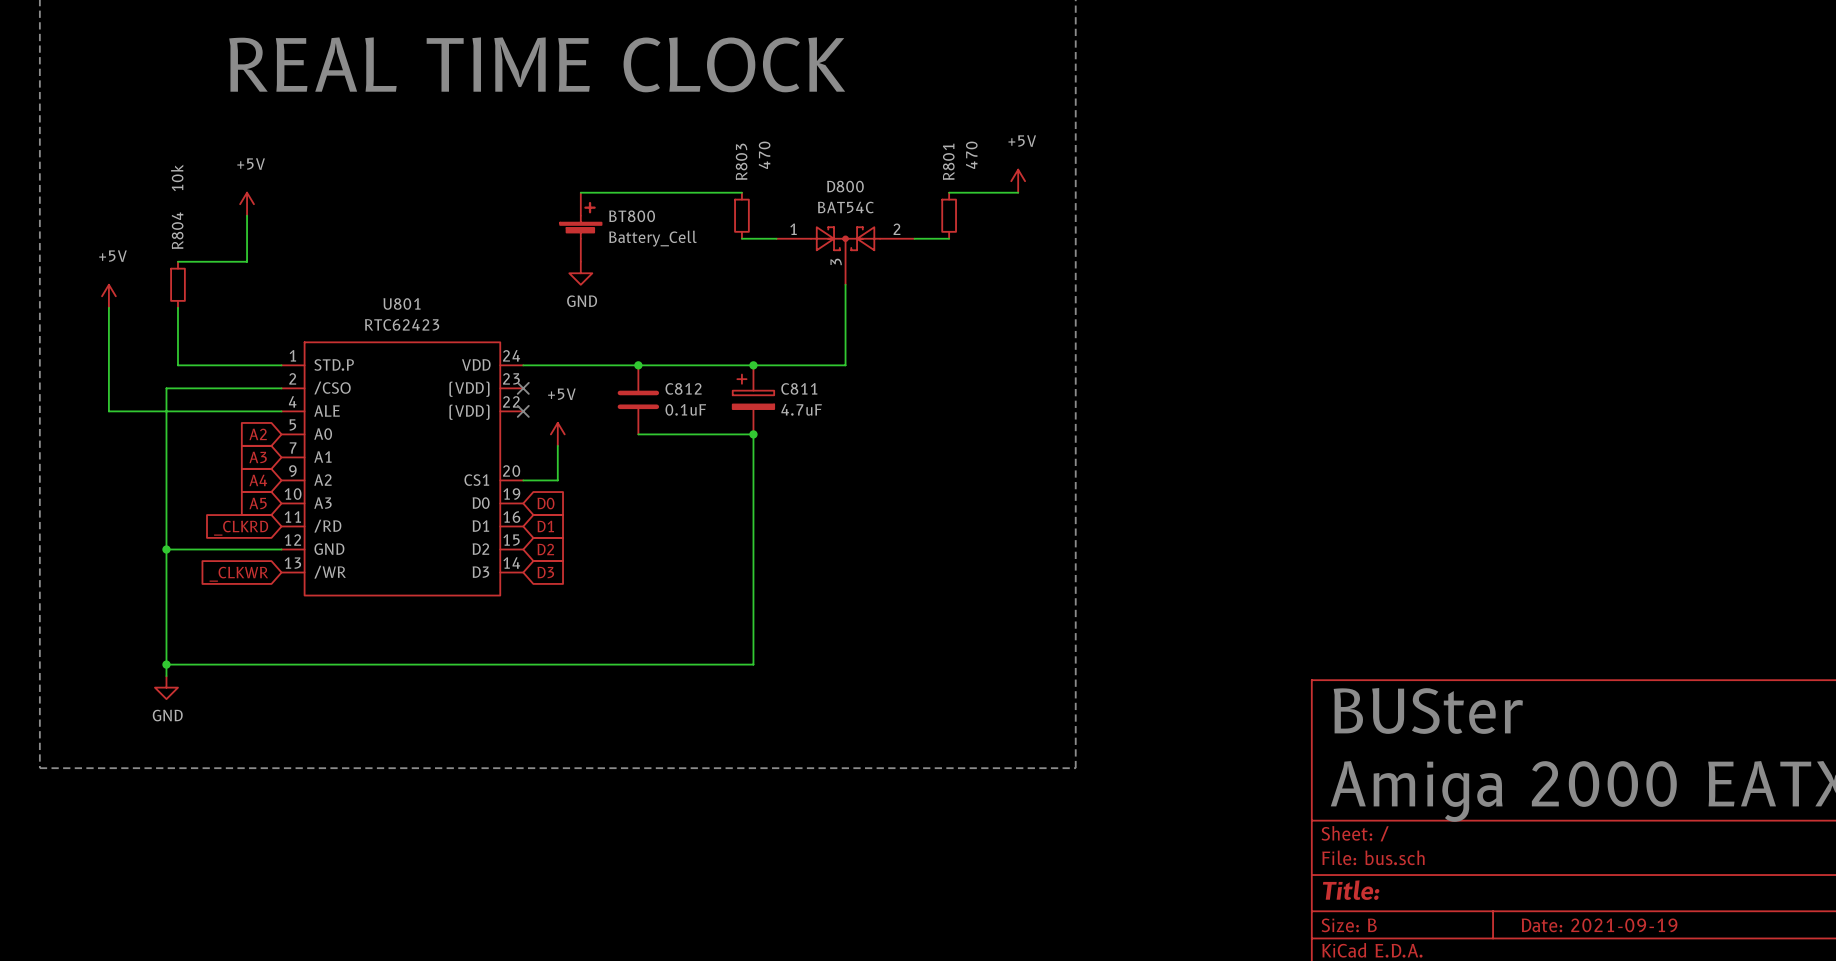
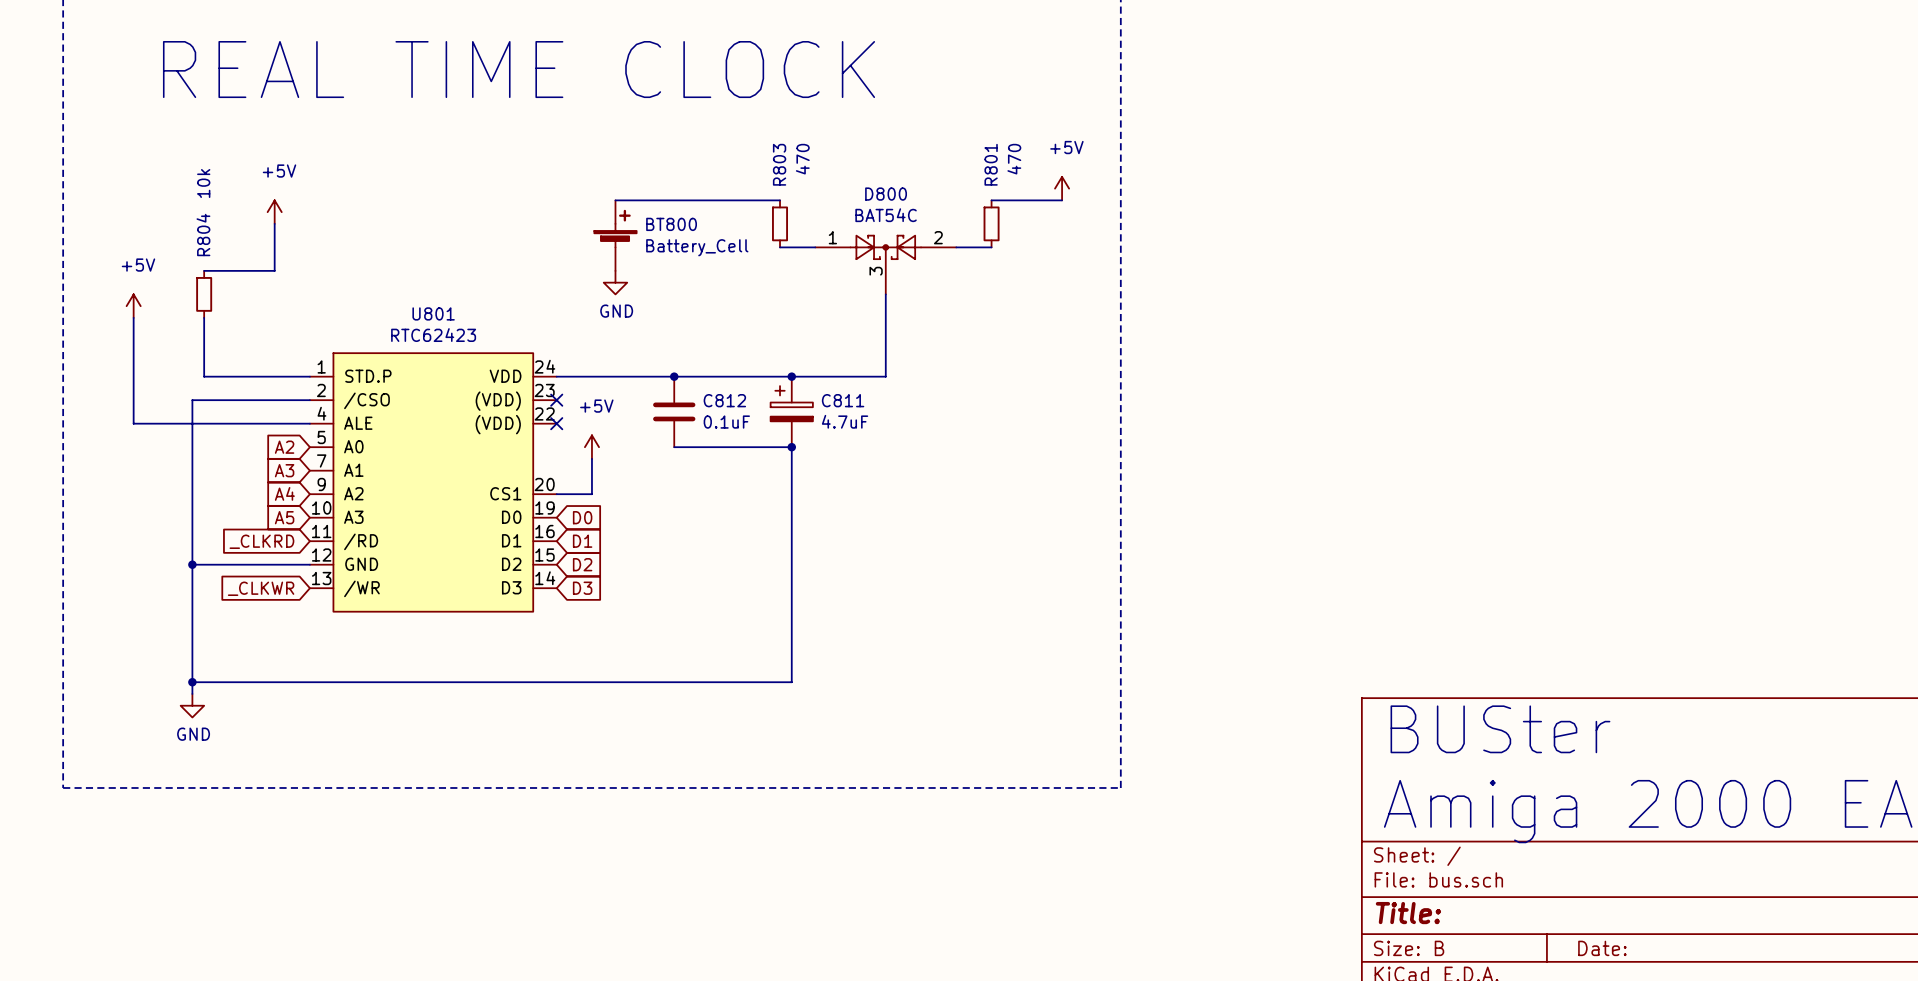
title block: Date: 2021-09-19 (1599, 925) -> Date: (1602, 948)

